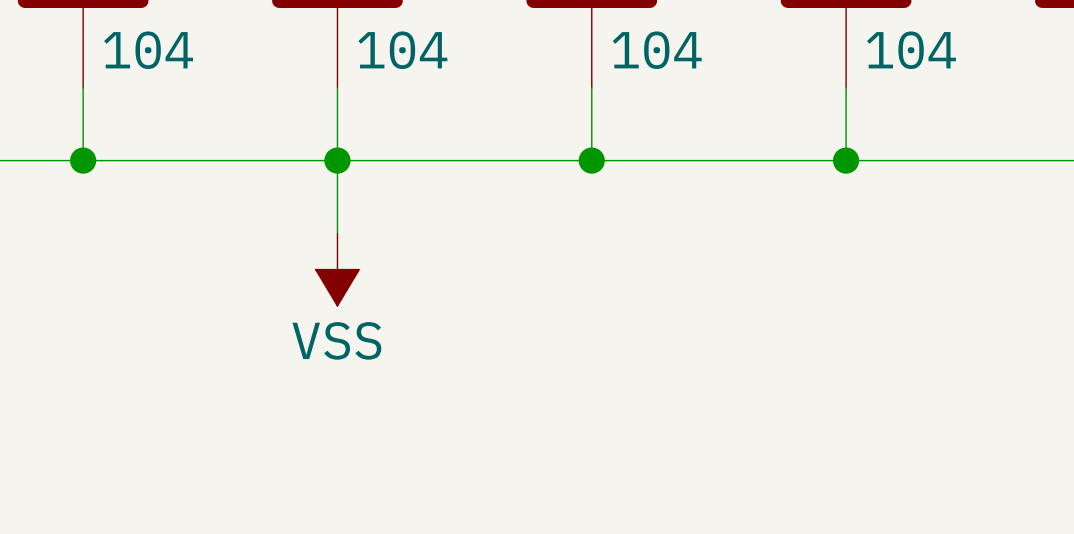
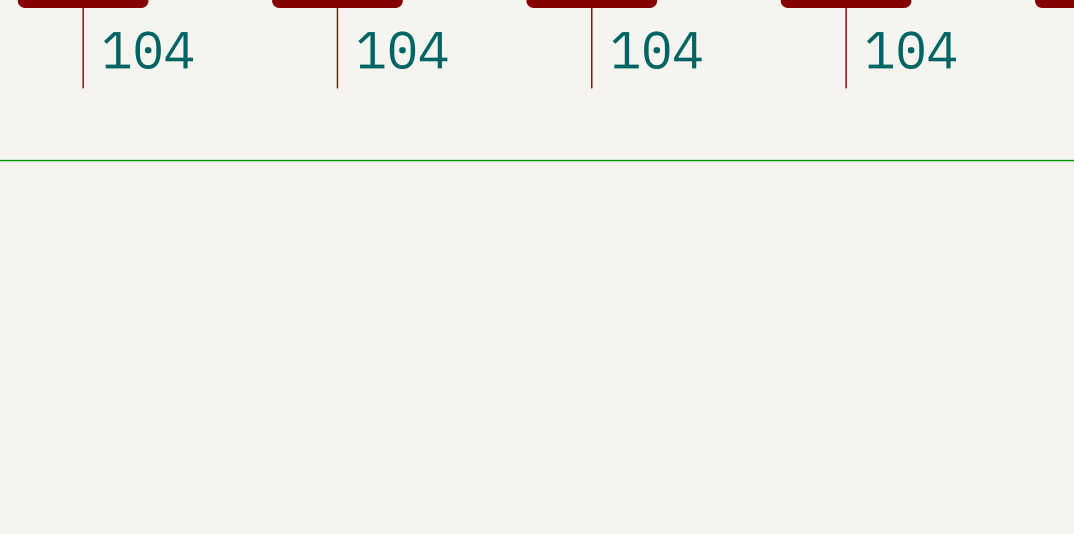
wire: (83, 87) (83, 160) -> none
wire: (337, 87) (337, 233) -> none
wire: (591, 87) (591, 160) -> none
wire: (846, 87) (846, 160) -> none
junction: (83, 160) -> none
junction: (337, 160) -> none
junction: (591, 160) -> none
junction: (846, 160) -> none
power symbol: VSS (337, 269) -> none

